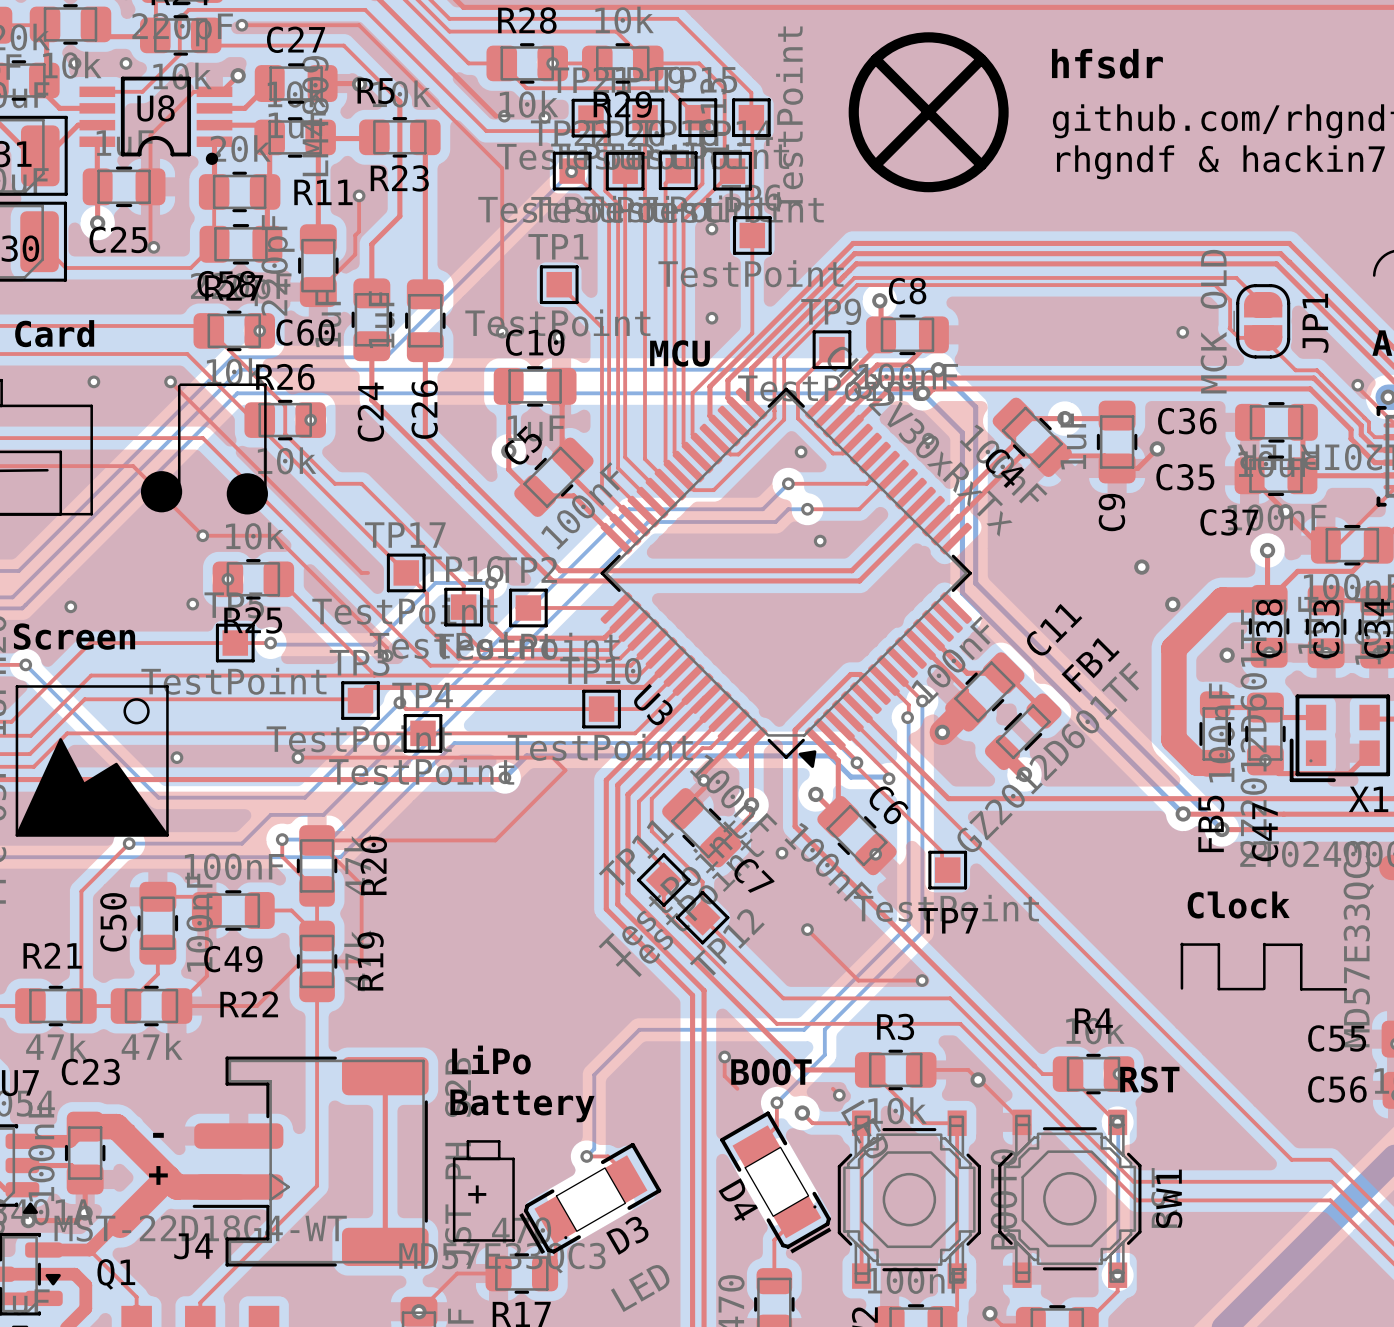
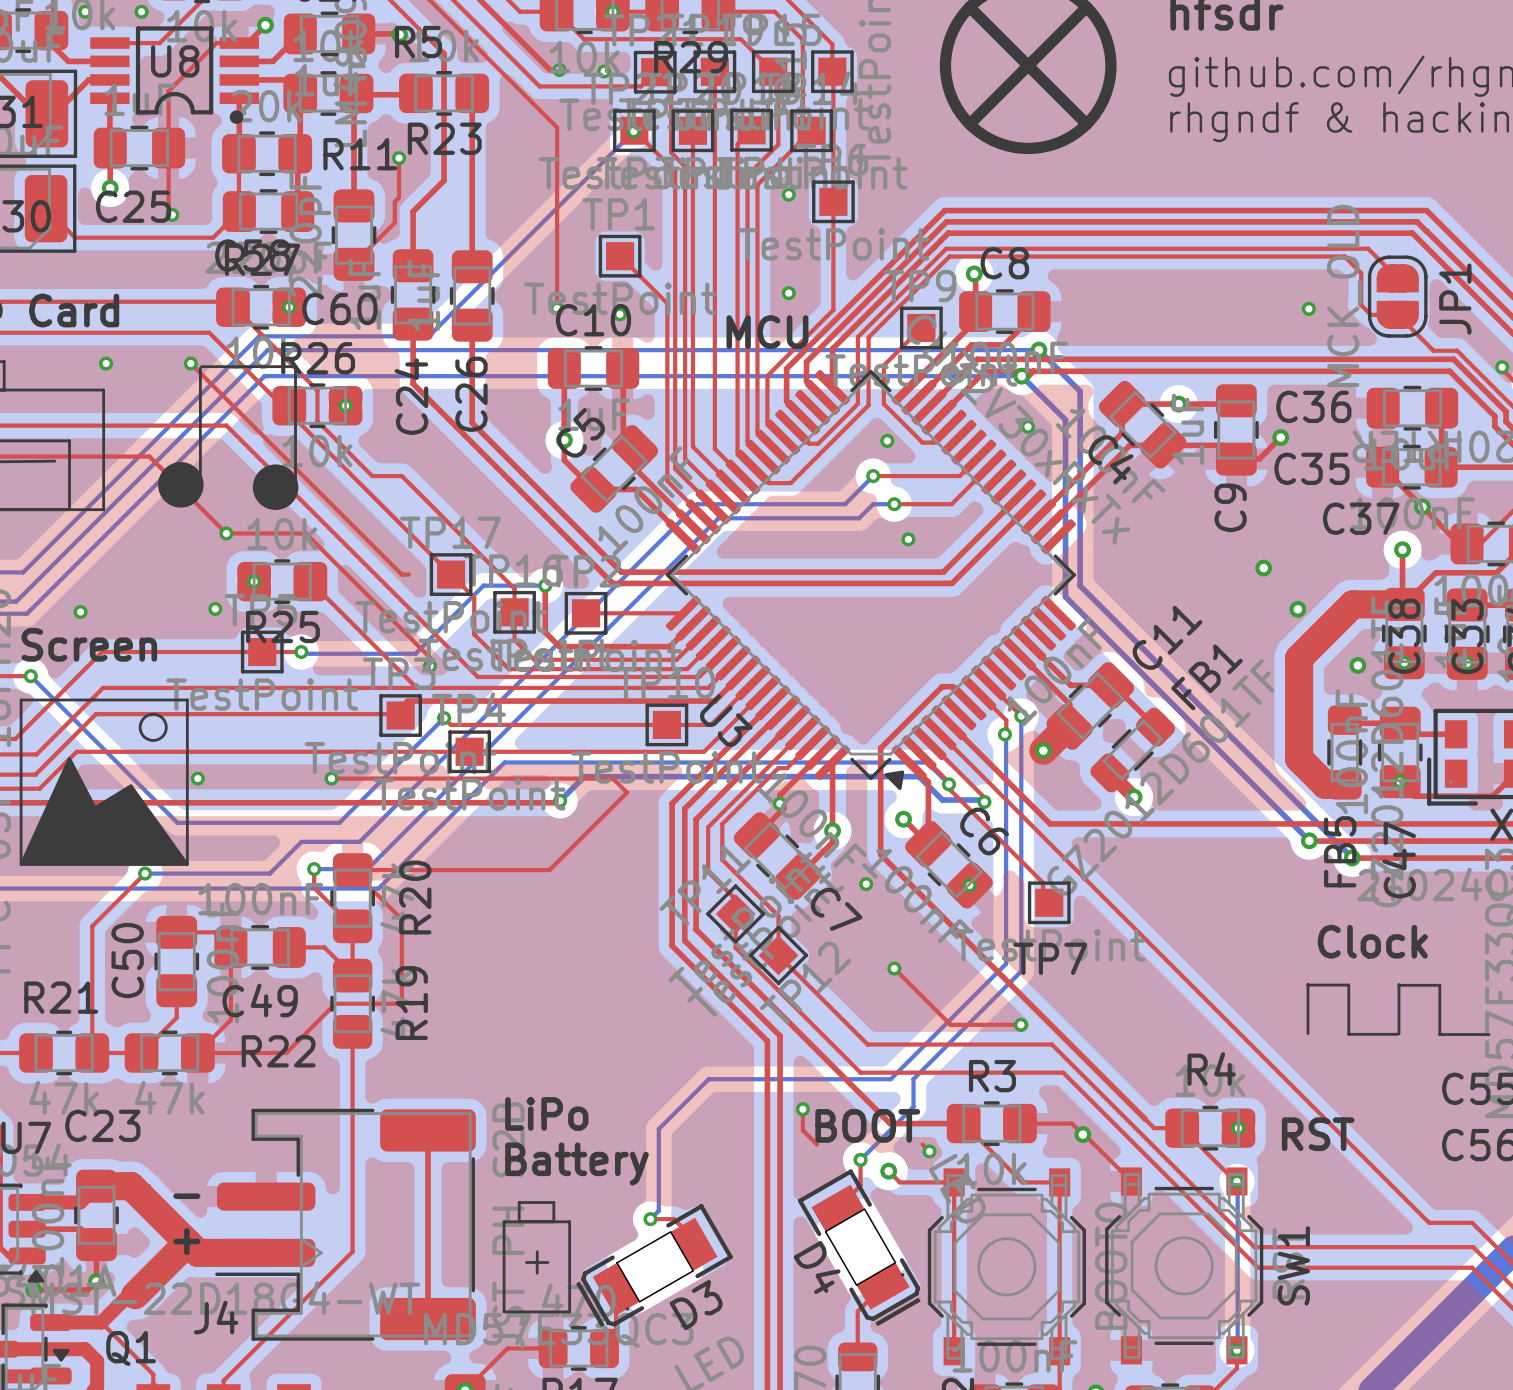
text position: RST (1149, 1079) -> RST (1318, 1134)

